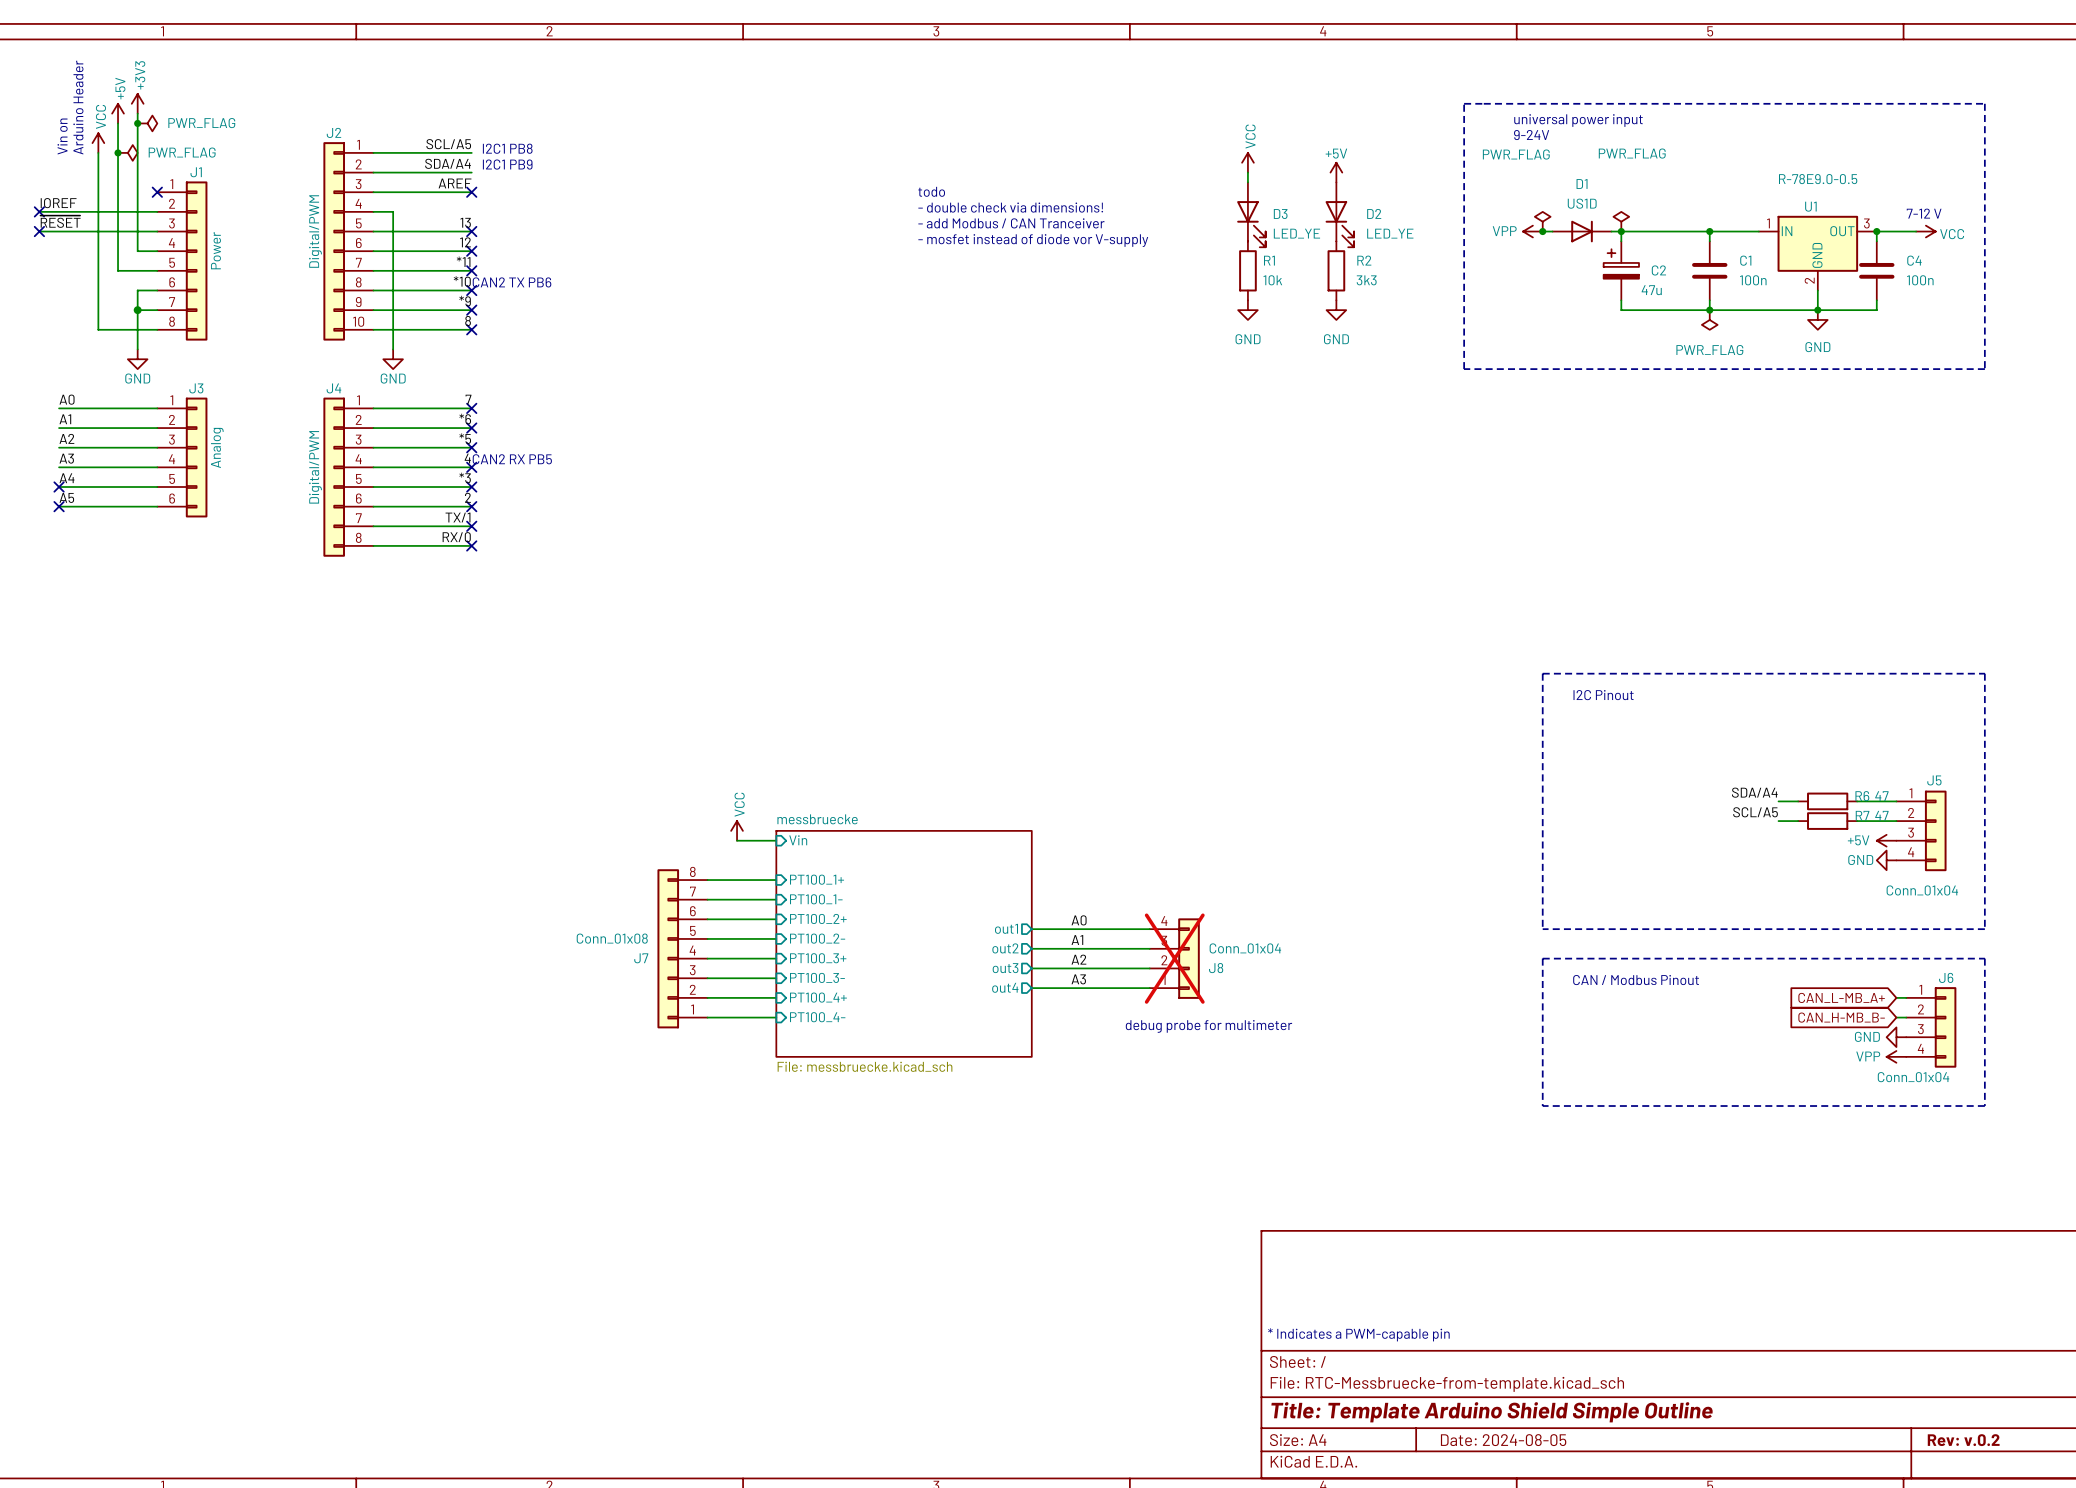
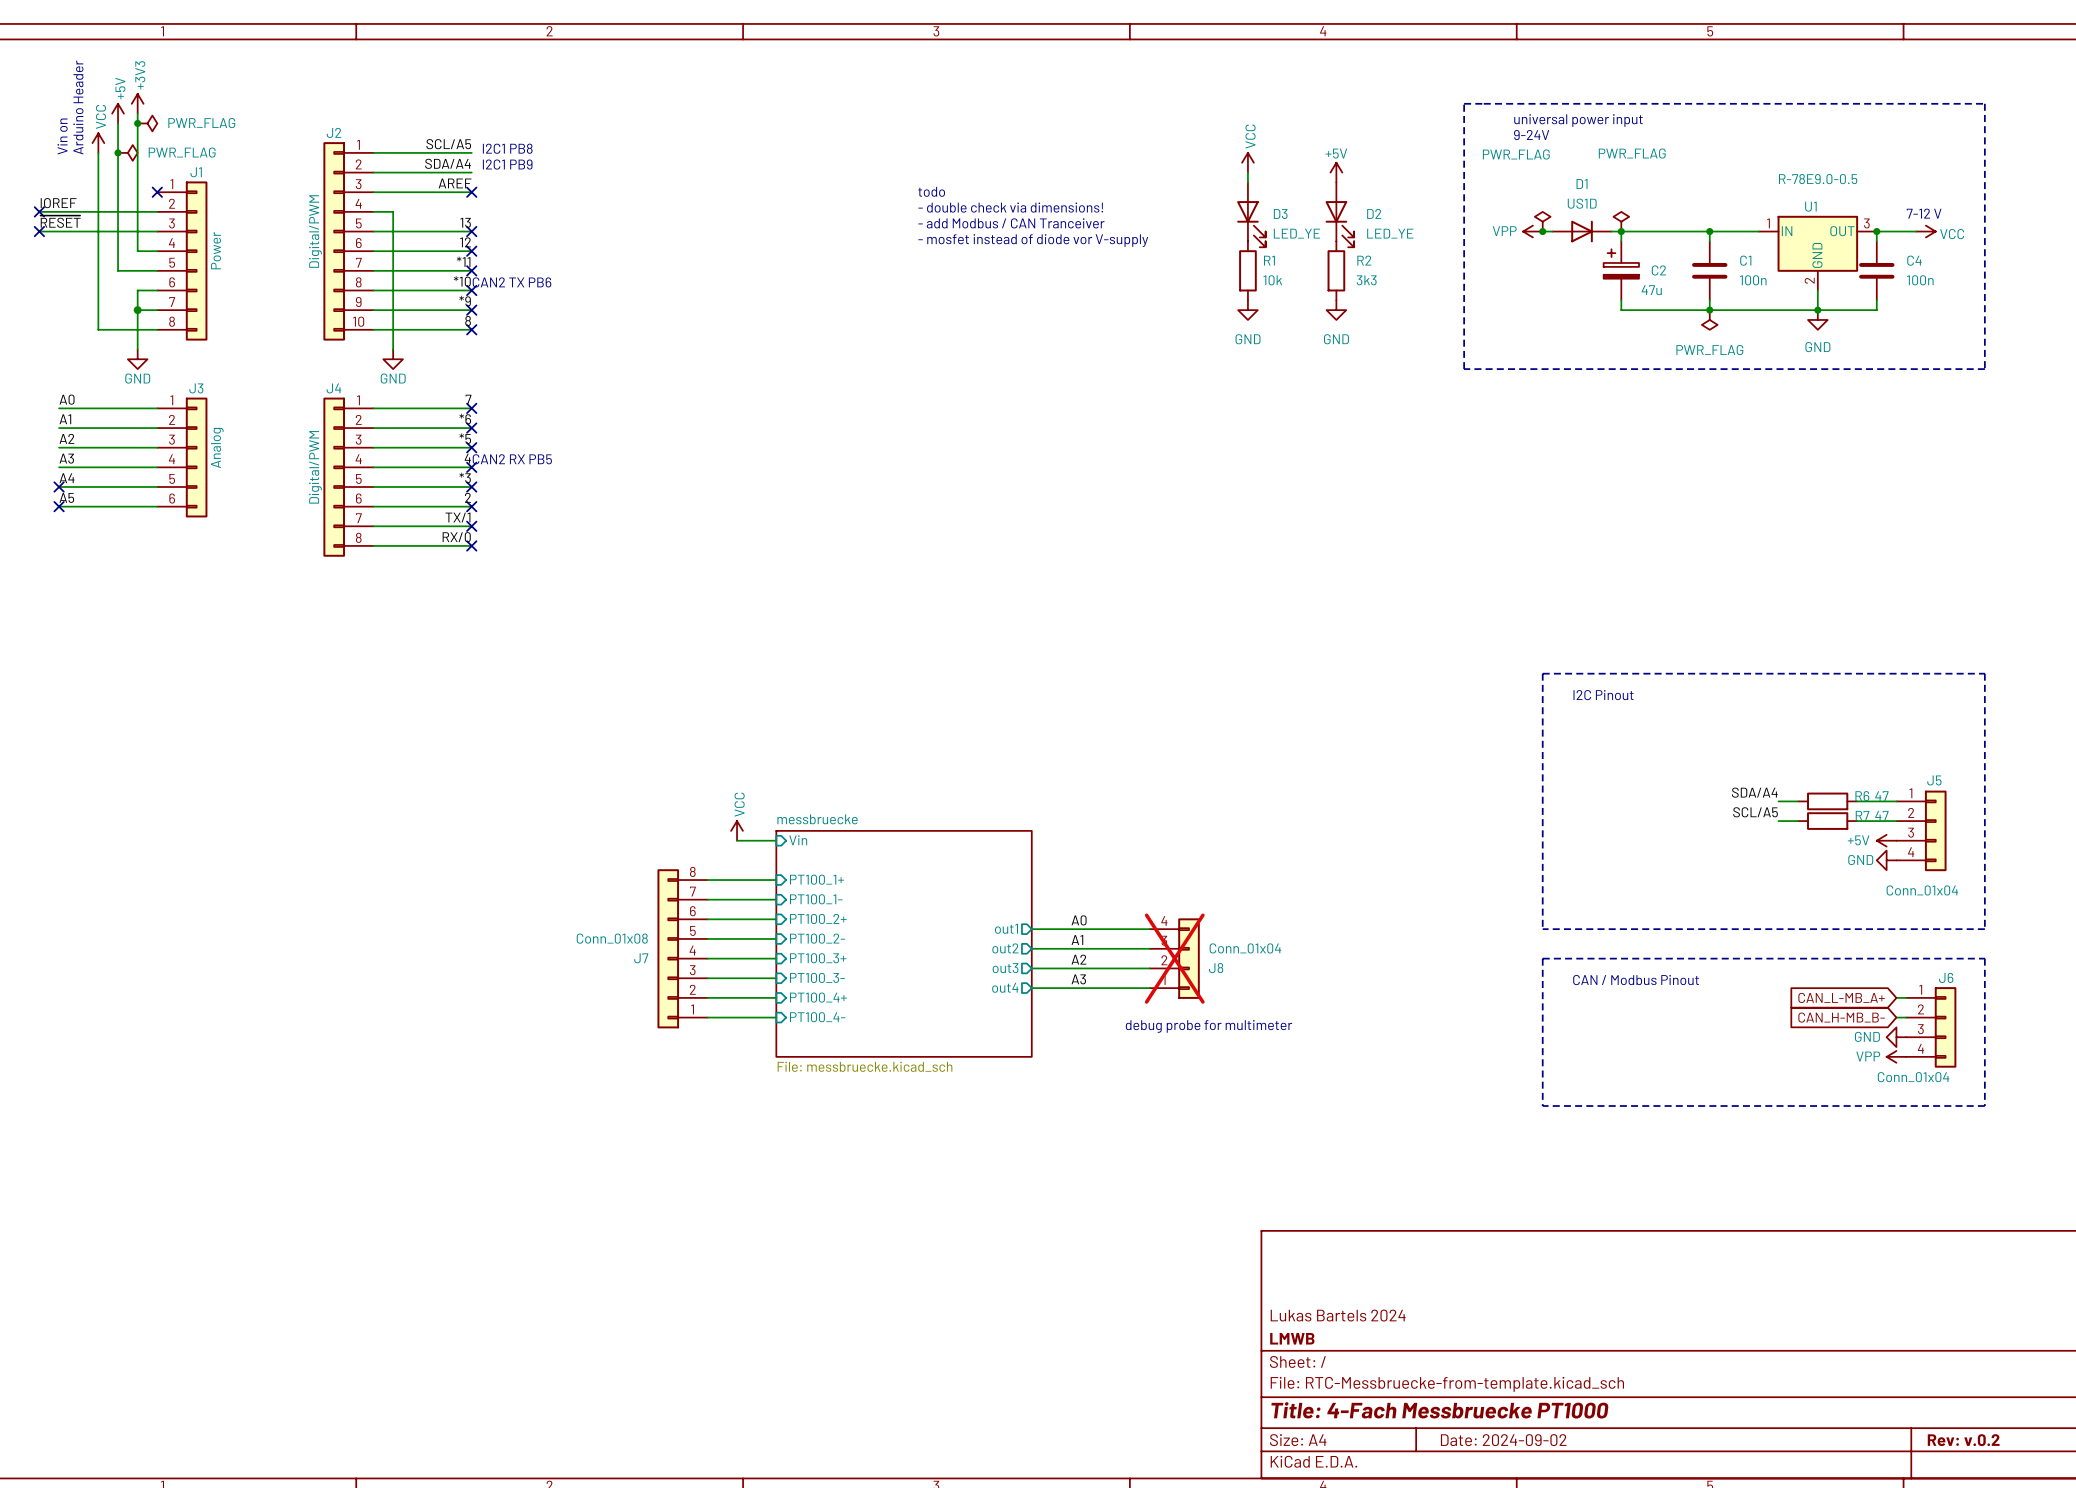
title block: none -> Lukas Bartels 2024 (1338, 1315)
text: * Indicates a PWM-capable pin (1358, 1334) -> none
title block: none -> LMWB (1292, 1338)
title block: Title: Template Arduino Shield Simple Outline (1492, 1412) -> Title: 4-Fach Messbruecke PT1000 (1439, 1410)
title block: Date: 2024-08-05 (1503, 1440) -> Date: 2024-09-02 (1503, 1440)

